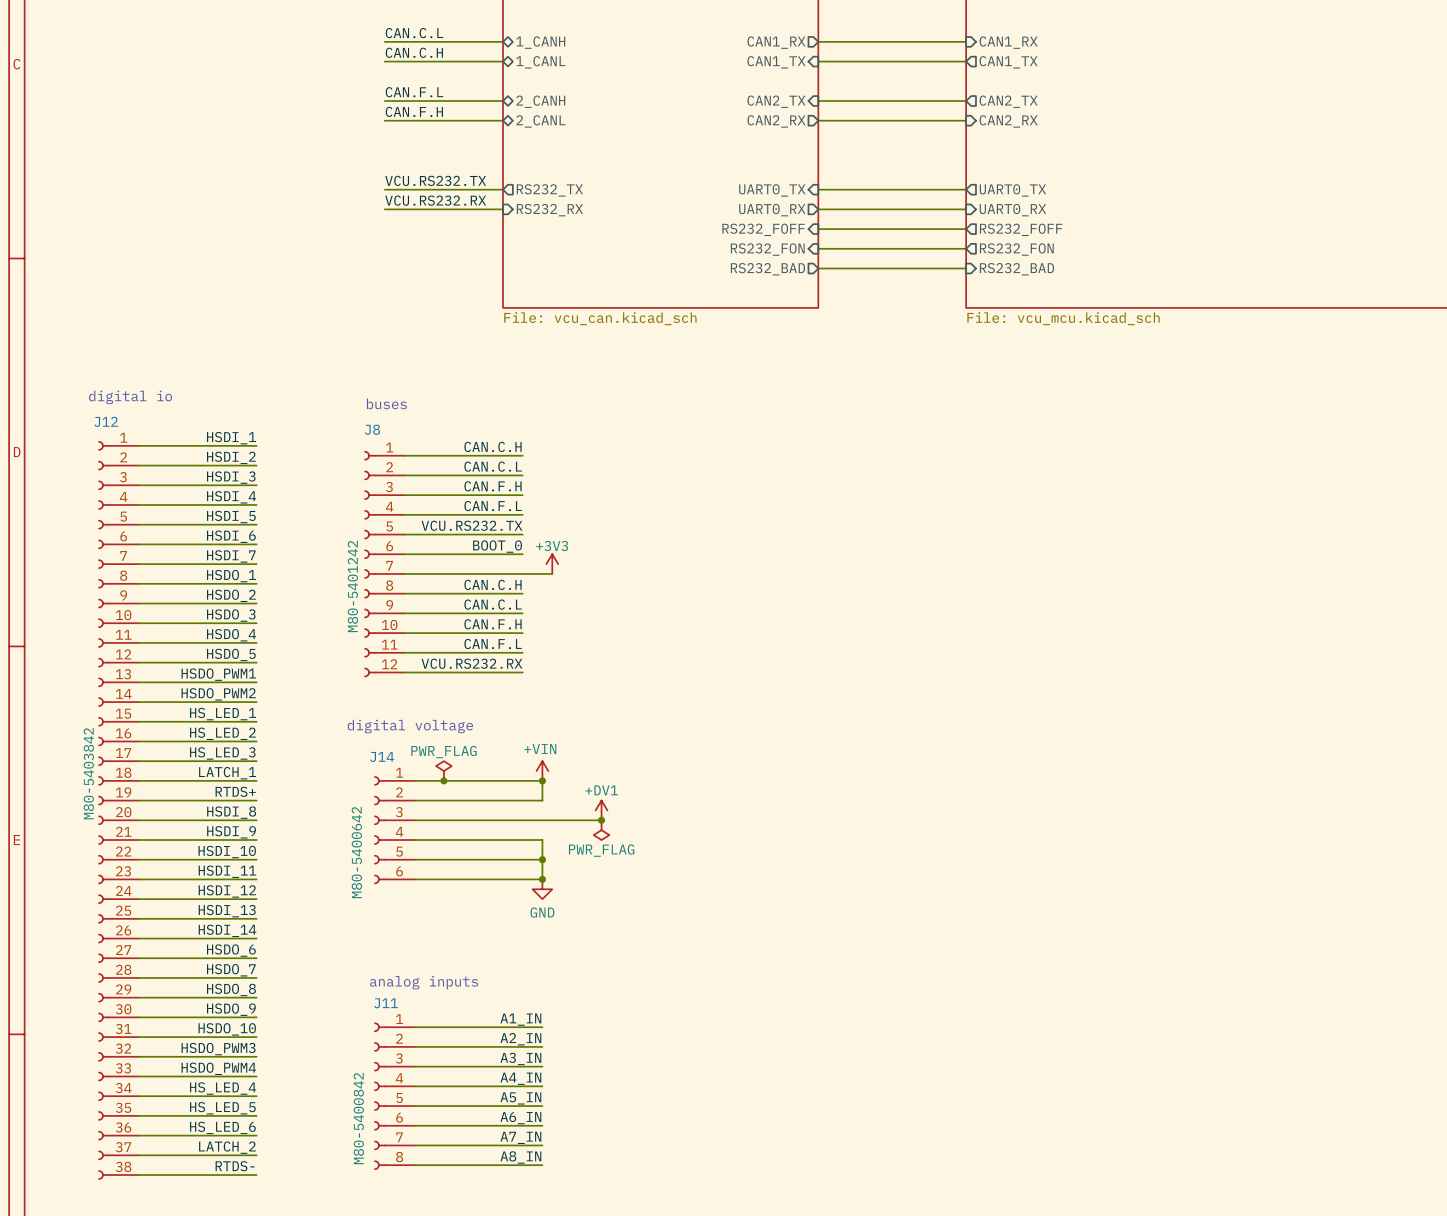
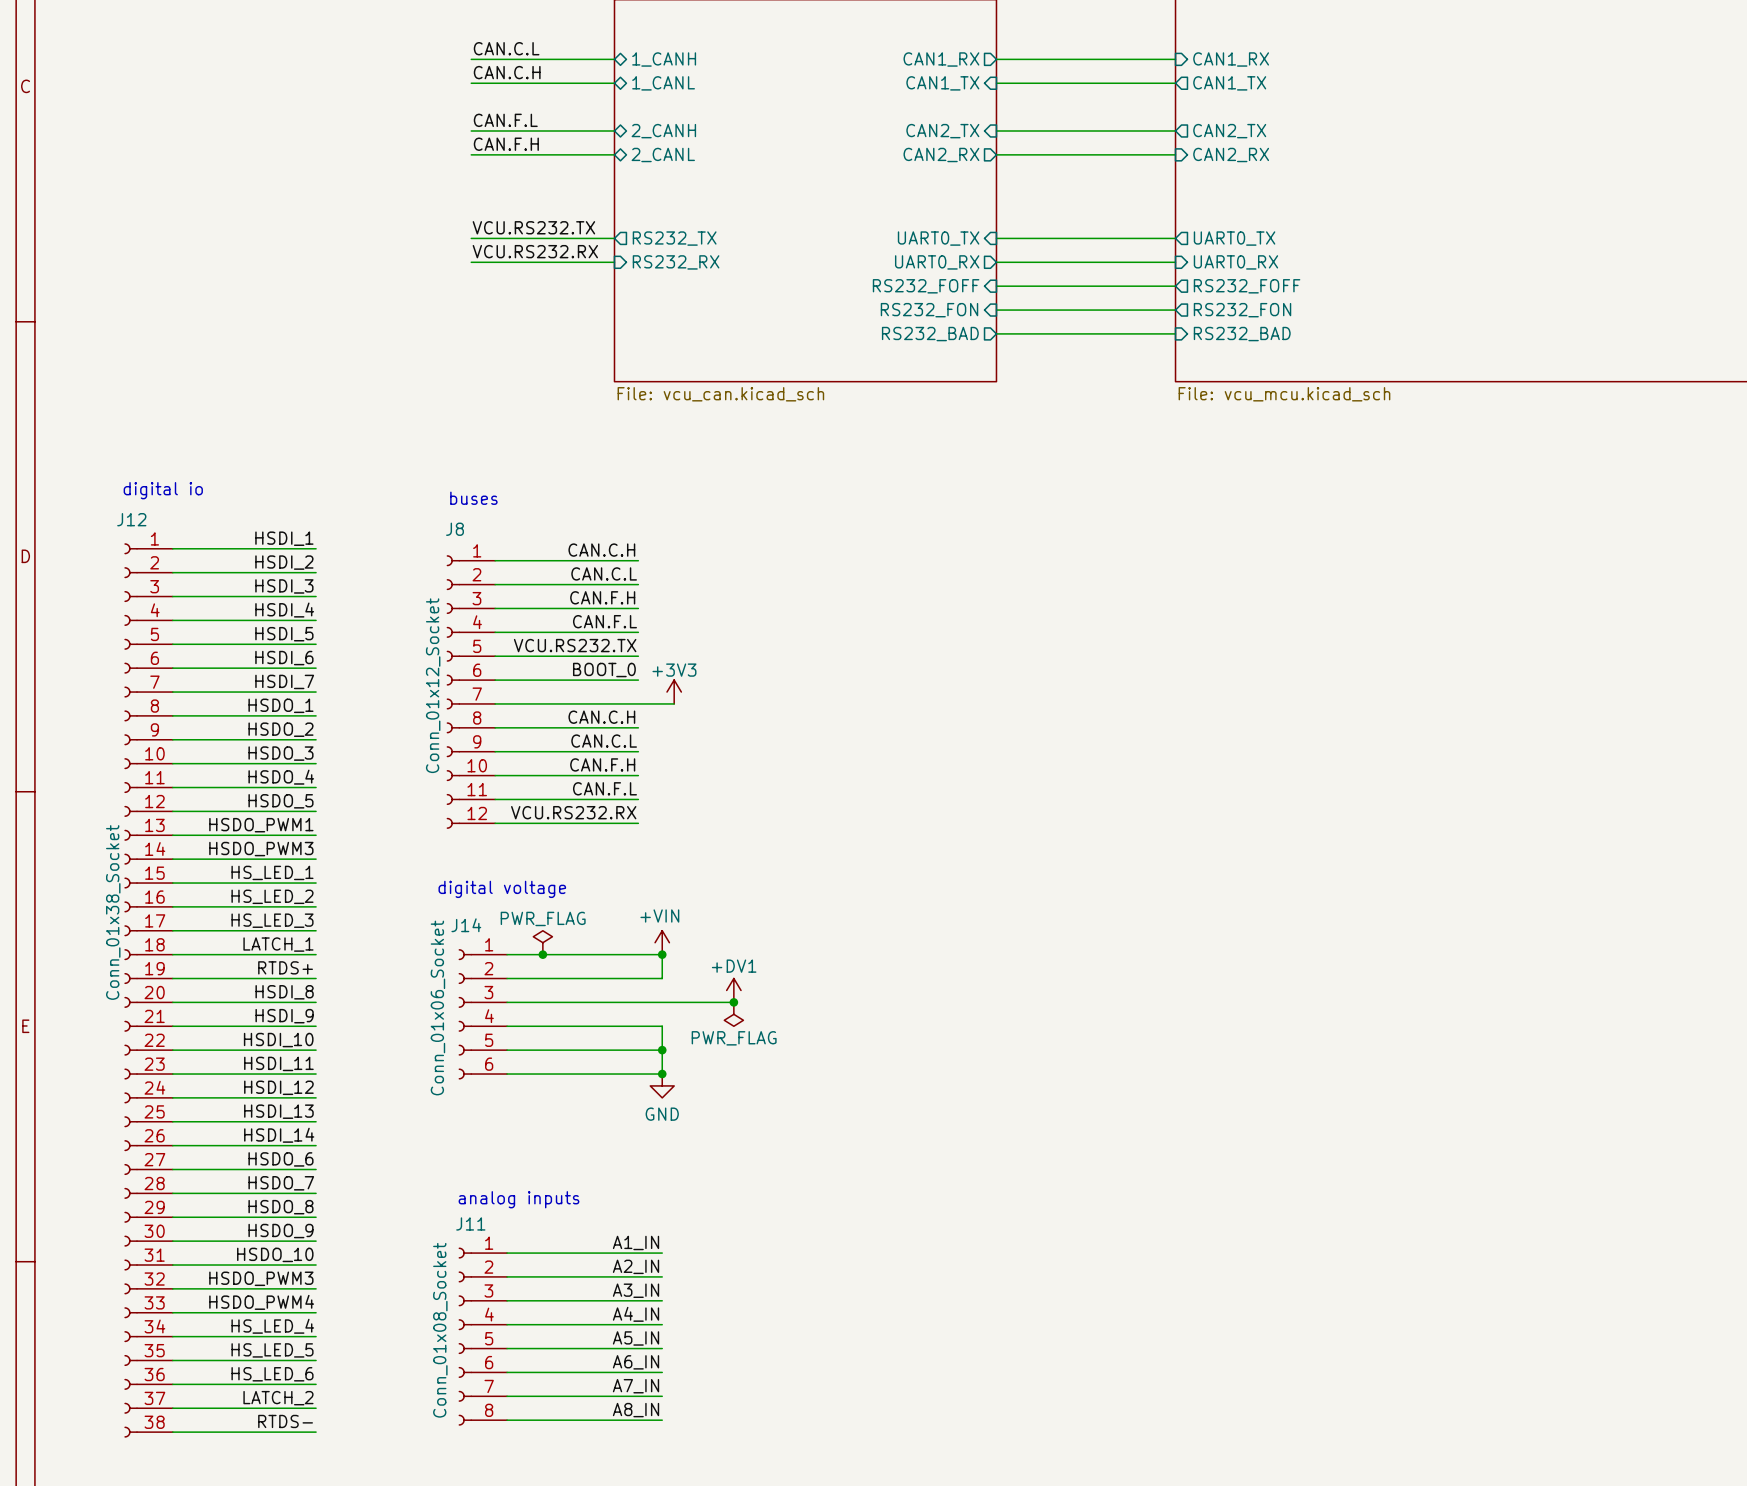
J8 value: M80-5401242 (352, 586) -> Conn_01x12_Socket (433, 685)
label: HSDO_PWM2 (218, 694) -> HSDO_PWM3 (261, 849)
J12 value: M80-5403842 (88, 773) -> Conn_01x38_Socket (113, 912)
J14 value: M80-5400642 (356, 852) -> Conn_01x06_Socket (437, 1007)
J11 value: M80-5400842 (358, 1118) -> Conn_01x08_Socket (440, 1330)

